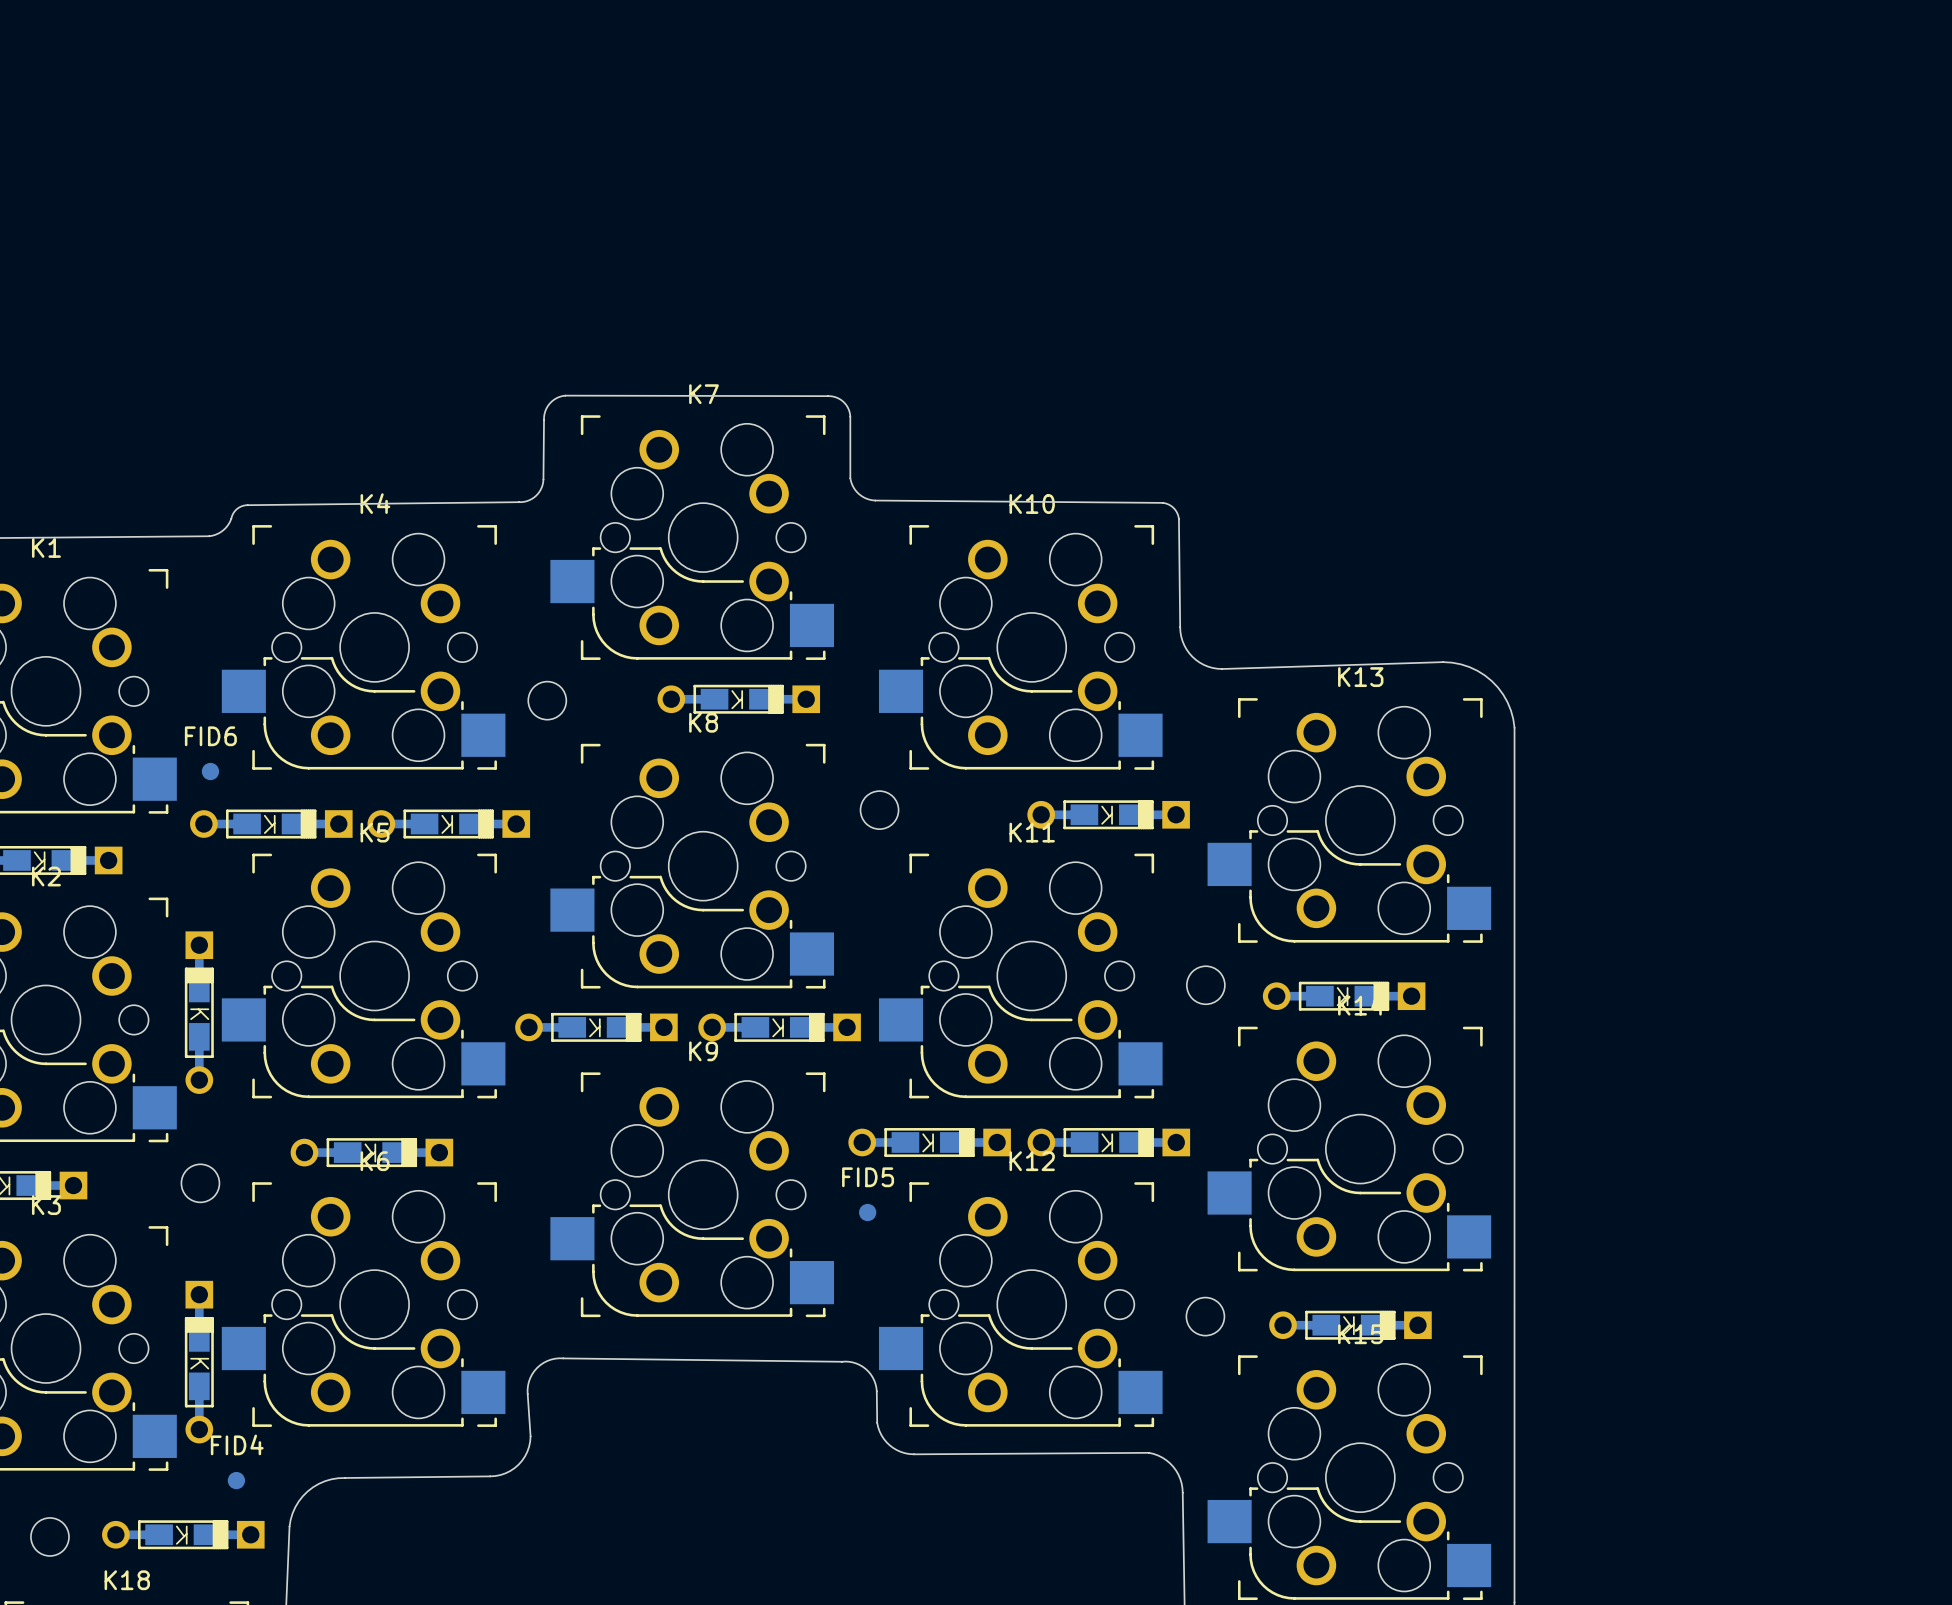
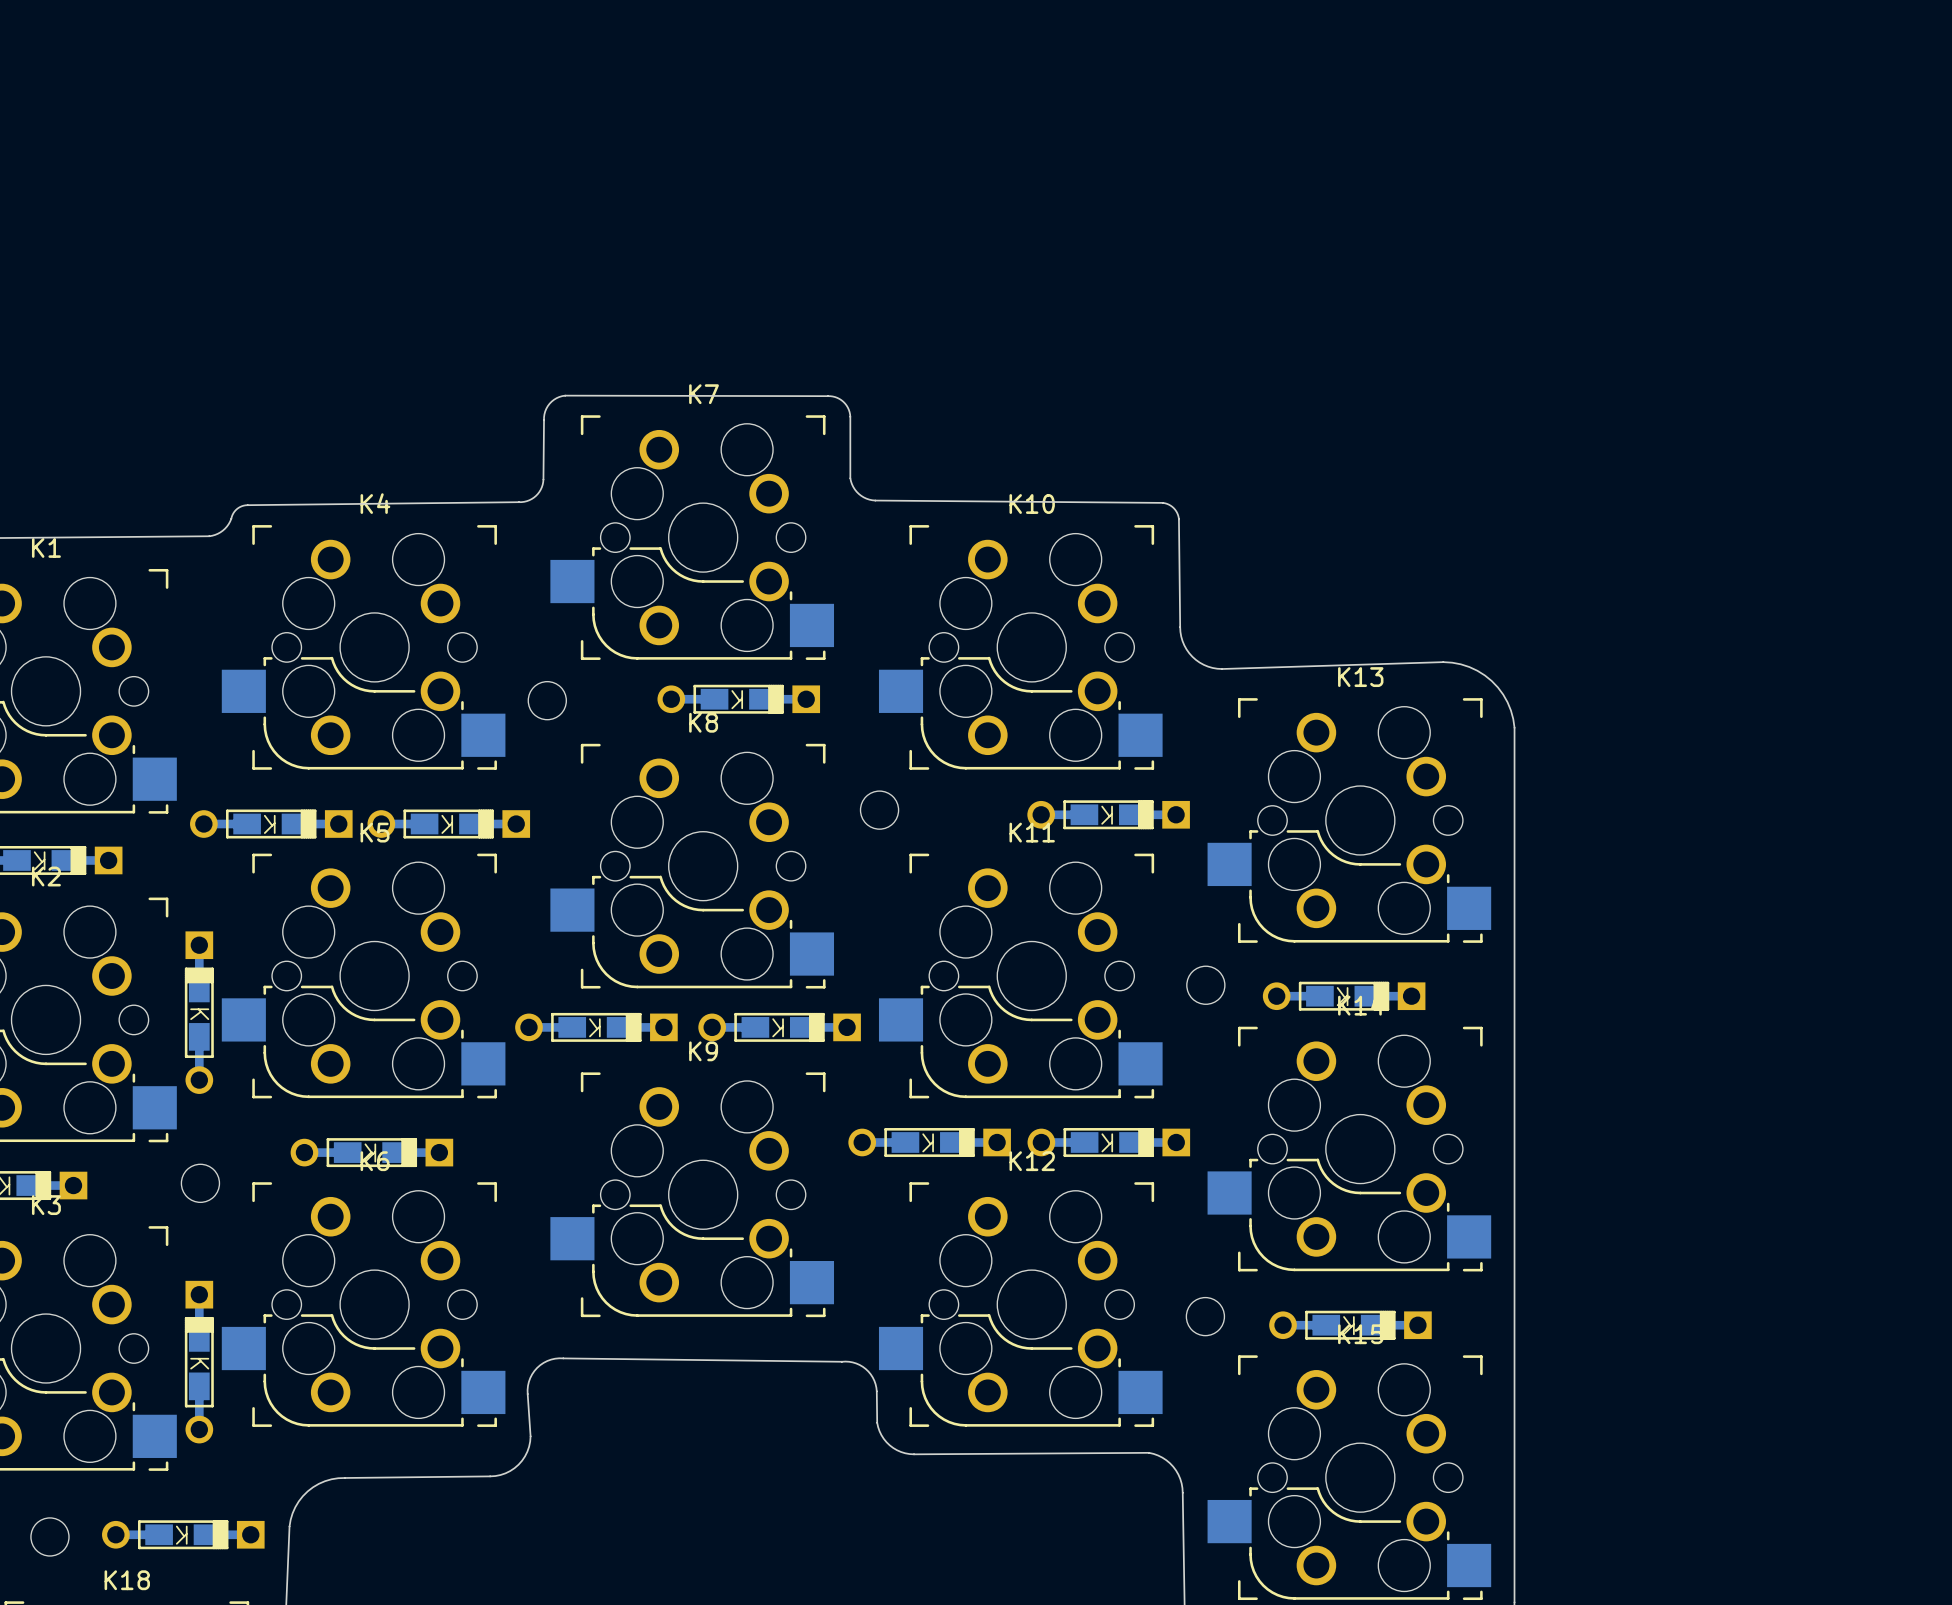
FID6: (210, 771) -> none
FID5: (867, 1212) -> none
FID4: (236, 1480) -> none

